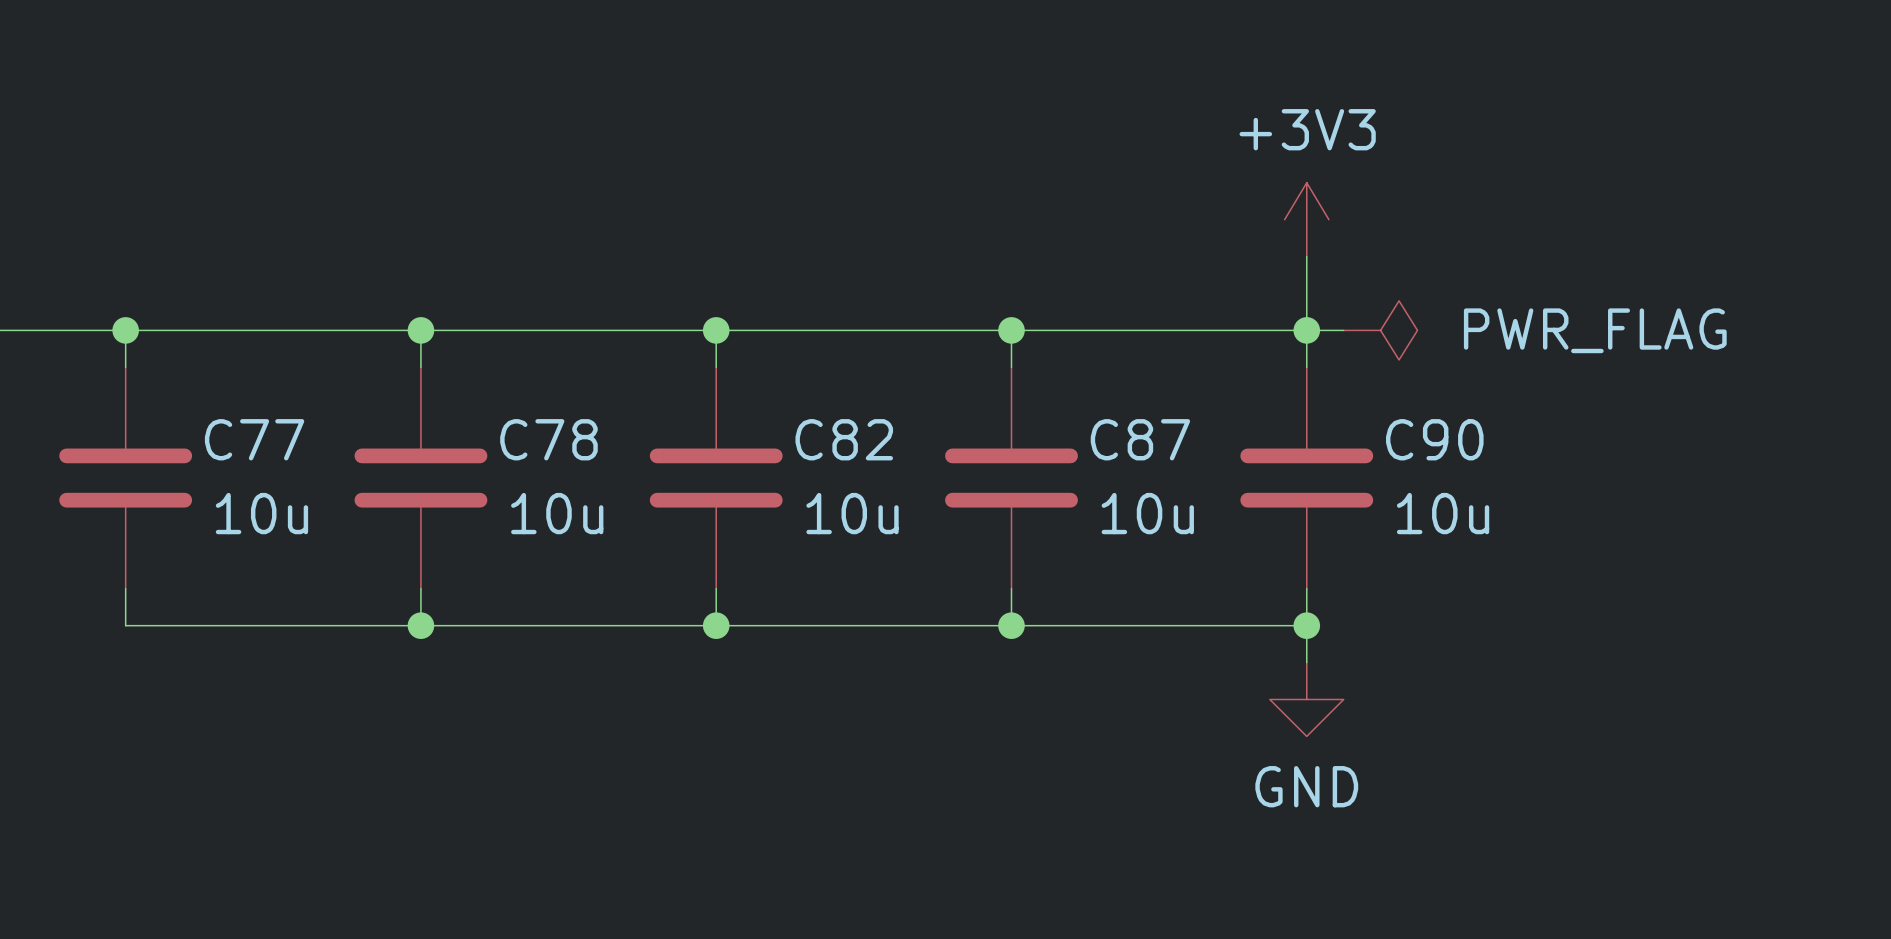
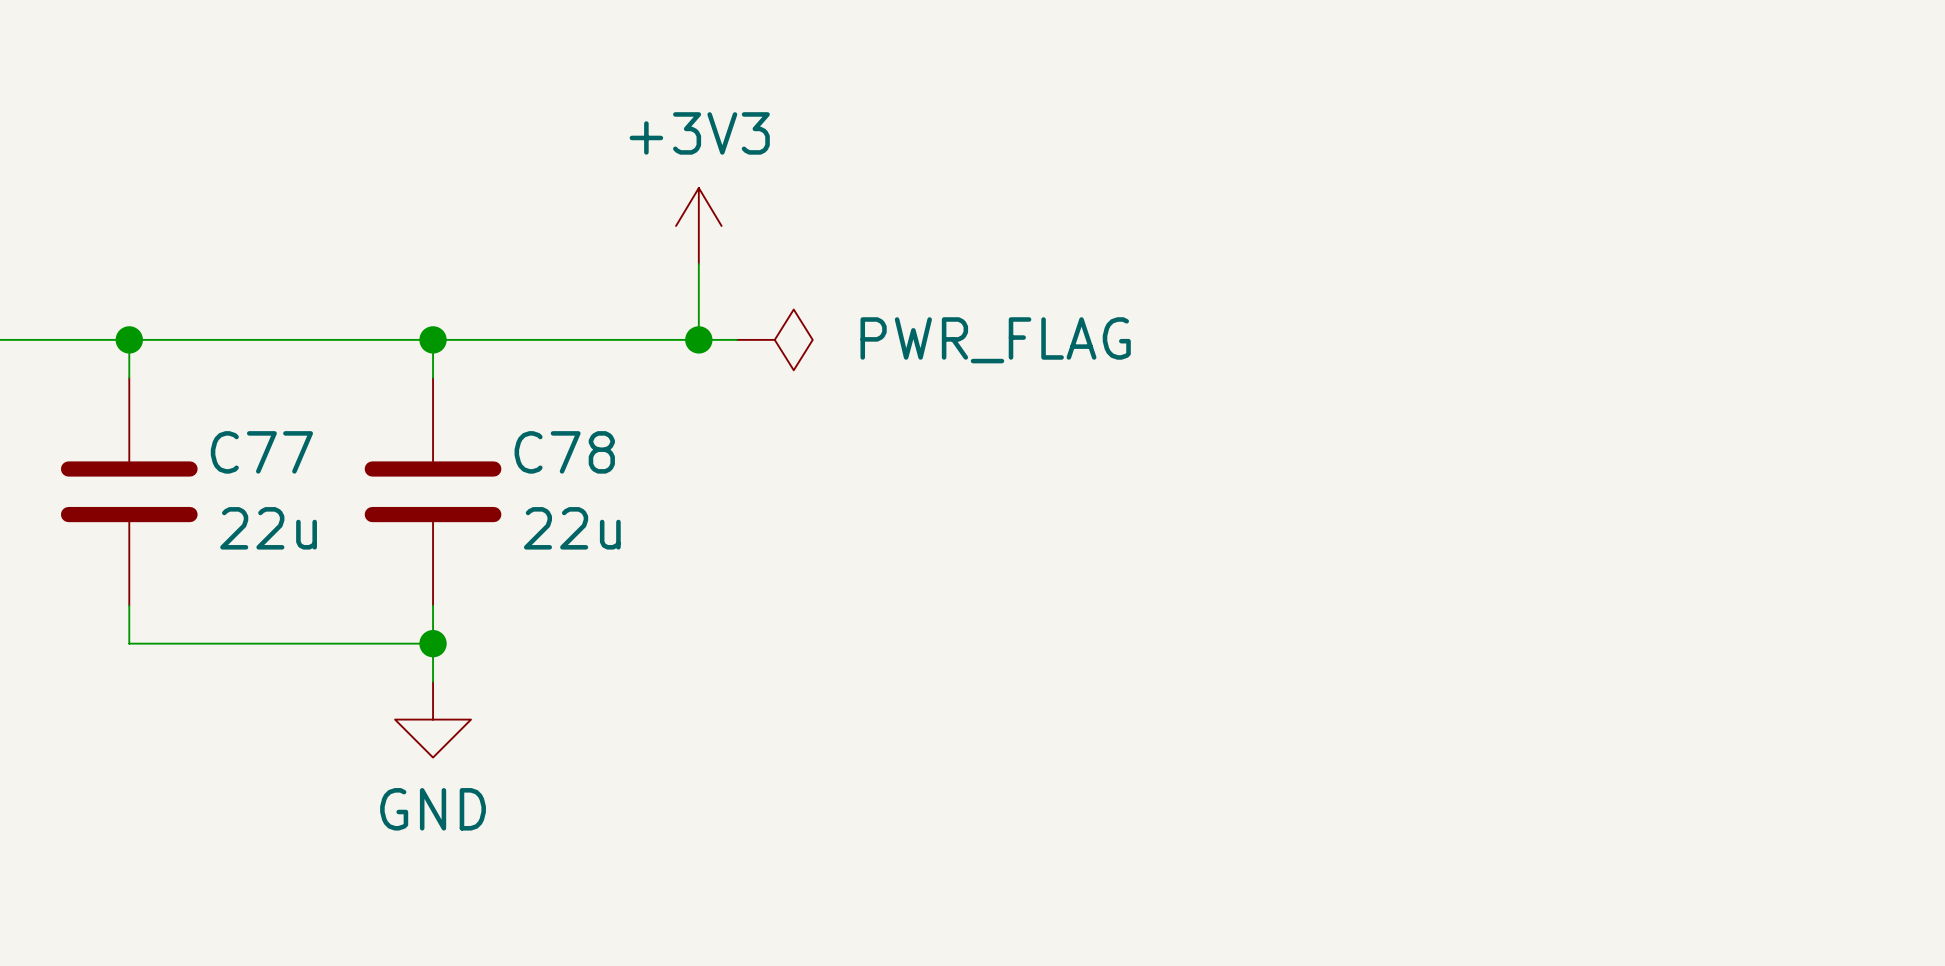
power symbol position: +3V3 (1306, 219) -> +3V3 (698, 225)
wire: (1306, 256) (1306, 367) -> none
junction position: (716, 330) -> (698, 339)
wire: (1011, 330) (1011, 367) -> none
junction: (1011, 330) -> none
junction: (1306, 330) -> none
wire: (1343, 330) (716, 330) (716, 367) -> none
power symbol position: PWR_FLAG (1380, 330) -> PWR_FLAG (774, 339)
C82: 10u (716, 478) -> none
C87: 10u (1011, 478) -> none
C90: 10u (1306, 478) -> none
C77 value: 10u (261, 513) -> 22u (268, 528)
C78 value: 10u (557, 513) -> 22u (572, 528)
wire: (716, 588) (716, 625) -> none
wire: (1011, 588) (1011, 625) -> none
wire: (1306, 588) (1306, 662) -> (698, 263) (698, 339)
wire: (420, 625) (1306, 625) -> (433, 643) (433, 681)
junction: (716, 625) -> none
junction: (1011, 625) -> none
junction: (1306, 625) -> none
power symbol: none -> GND (433, 719)
power symbol: GND (1306, 699) -> none

